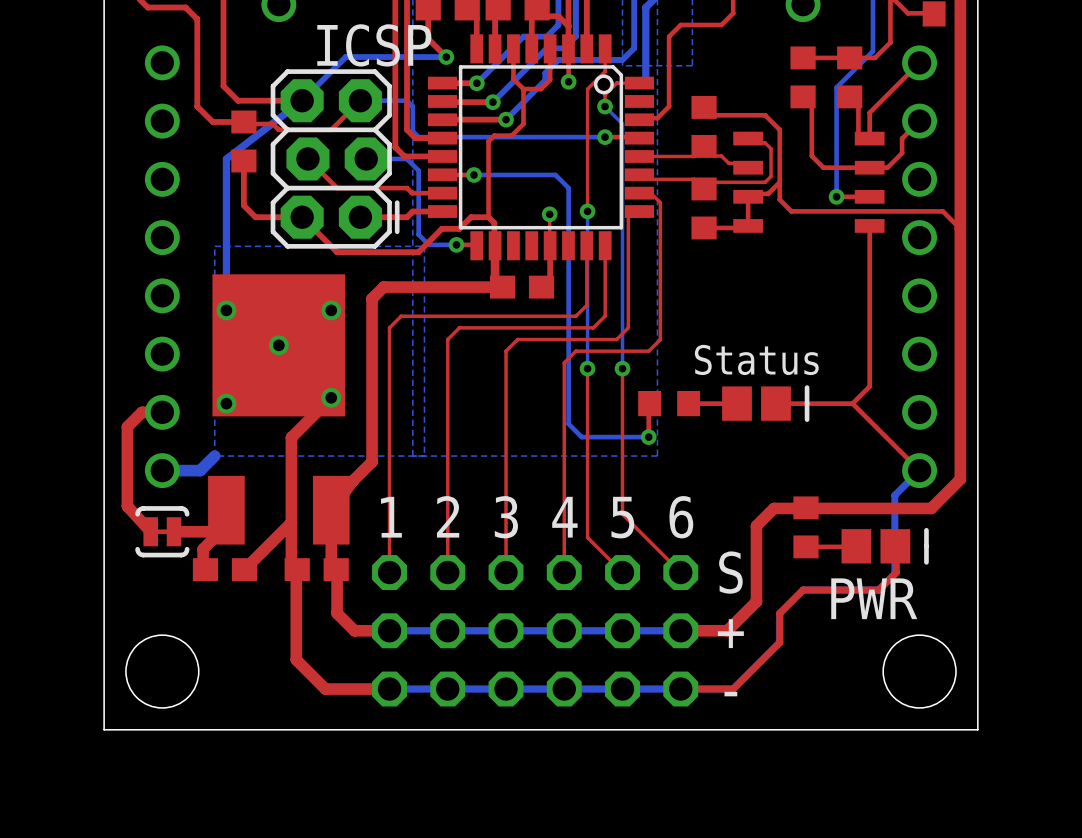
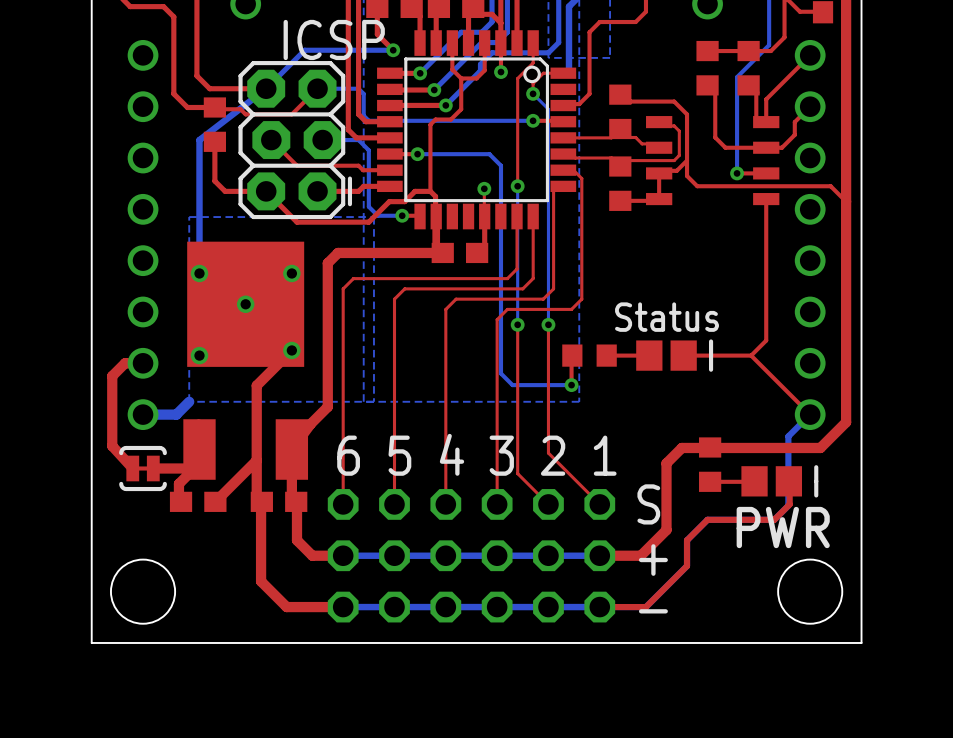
text: 2 (448, 516) -> 5 (399, 455)
text: 1 (391, 517) -> 6 (348, 455)
text: 3 (506, 517) -> 4 (452, 454)
text: 4 (564, 517) -> 3 (501, 455)
text: 5 (622, 517) -> 2 (553, 455)
text: 6 (681, 517) -> 1 (605, 455)

